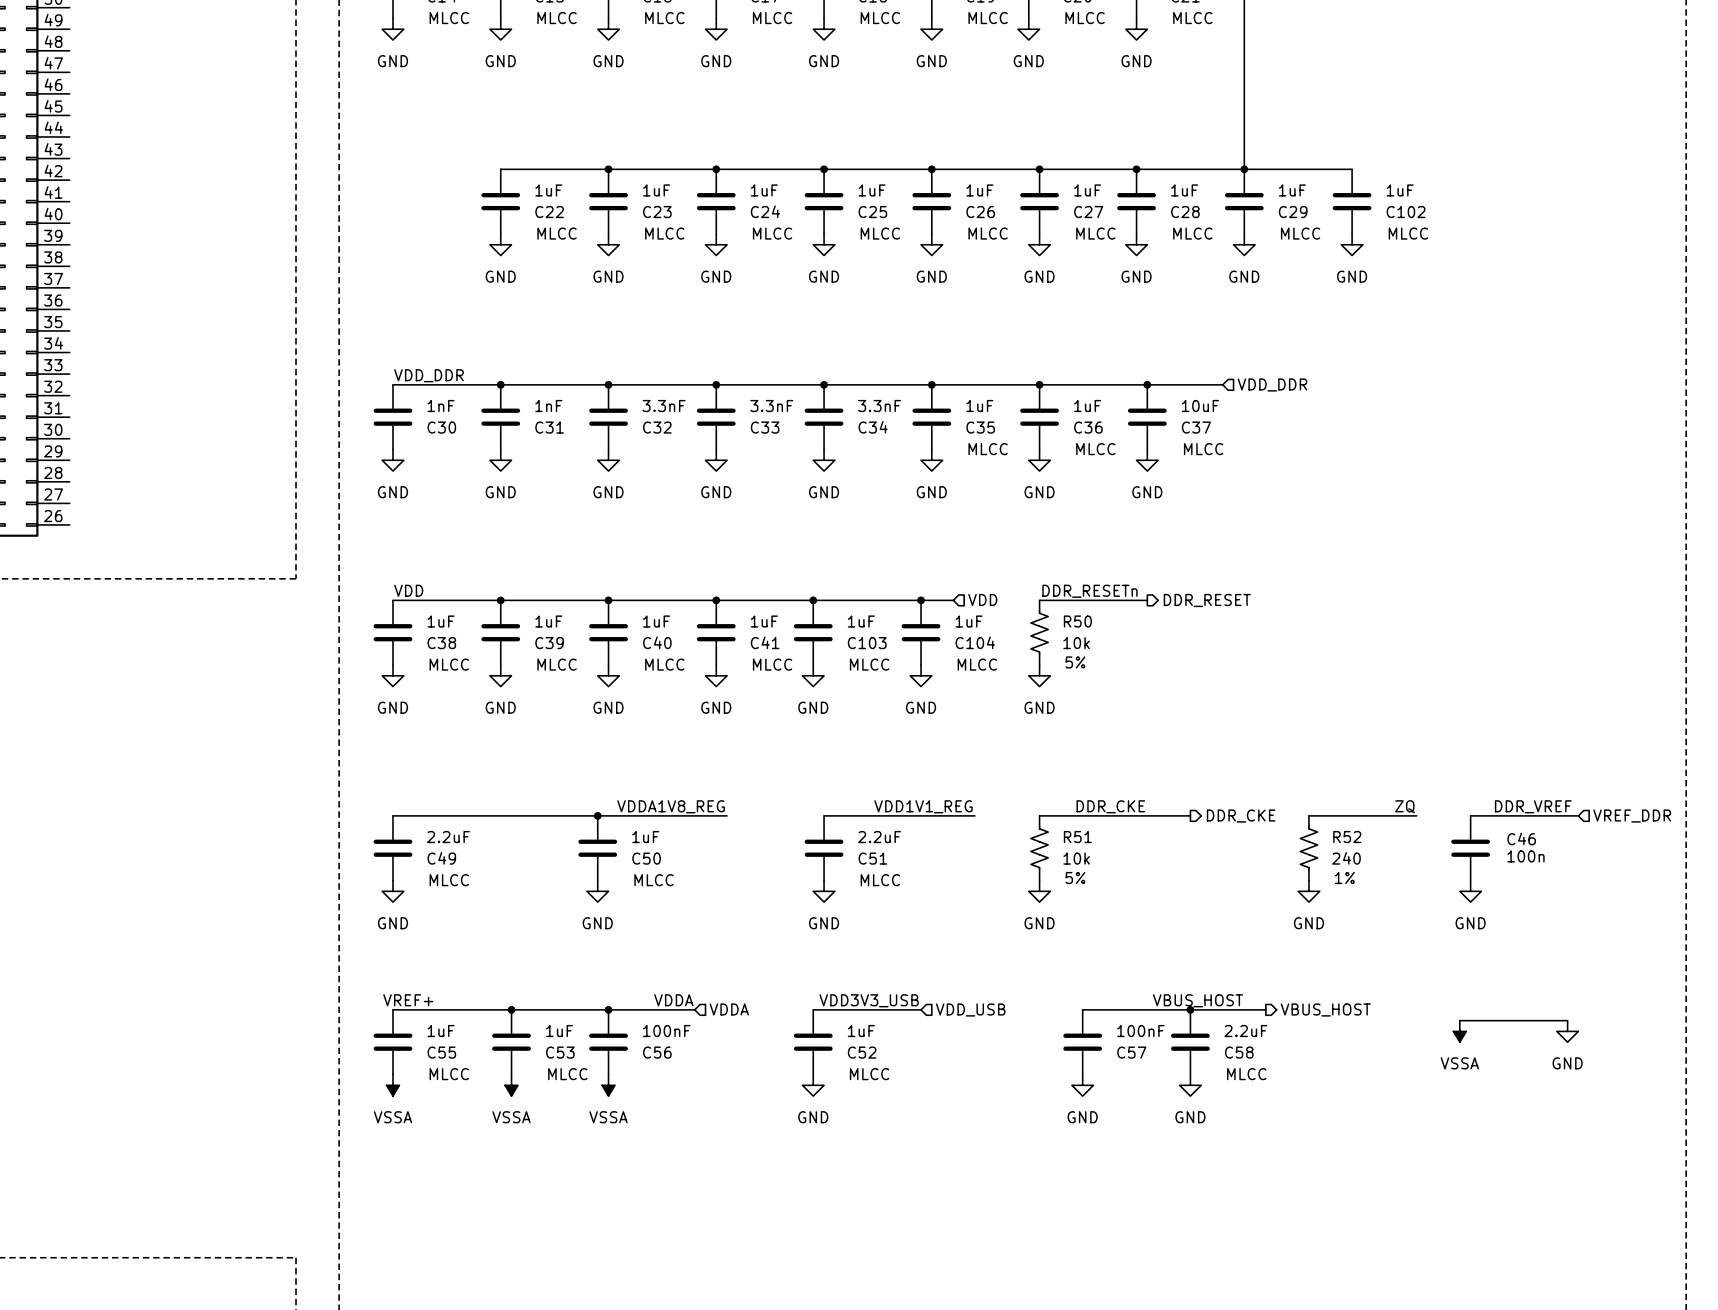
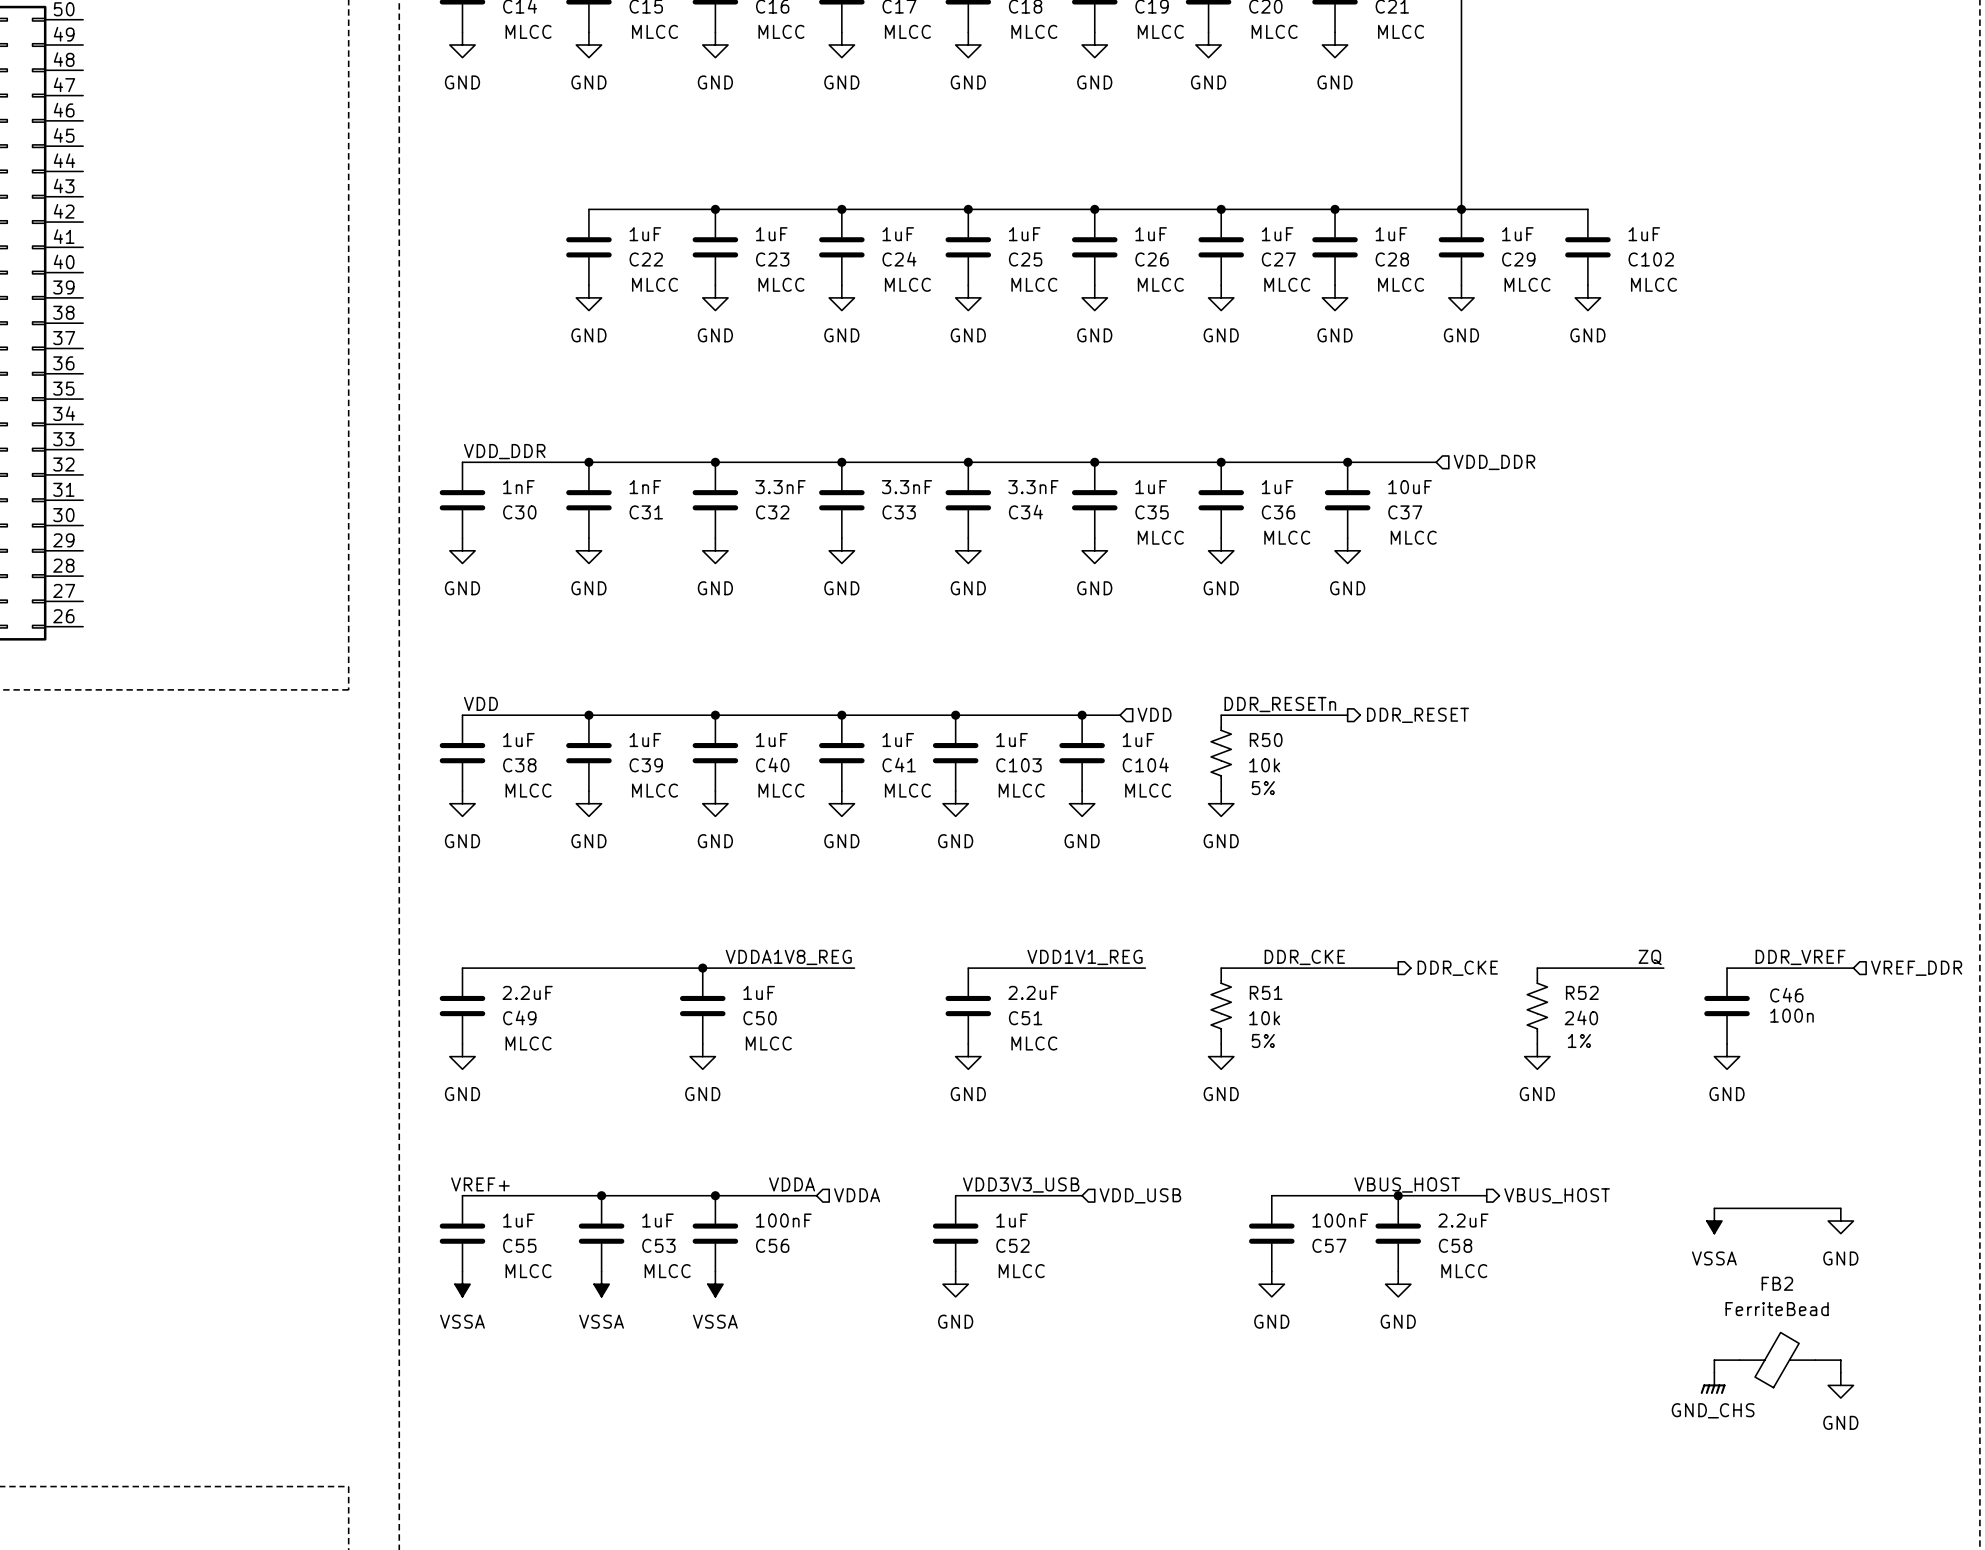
wire: none -> (1739, 1360) (1714, 1360) (1714, 1372)
FB2: none -> FerriteBead (1777, 1360)
wire: none -> (1815, 1360) (1840, 1360) (1840, 1372)
power symbol: none -> GND_CHS (1713, 1383)
power symbol: none -> GND (1840, 1385)

